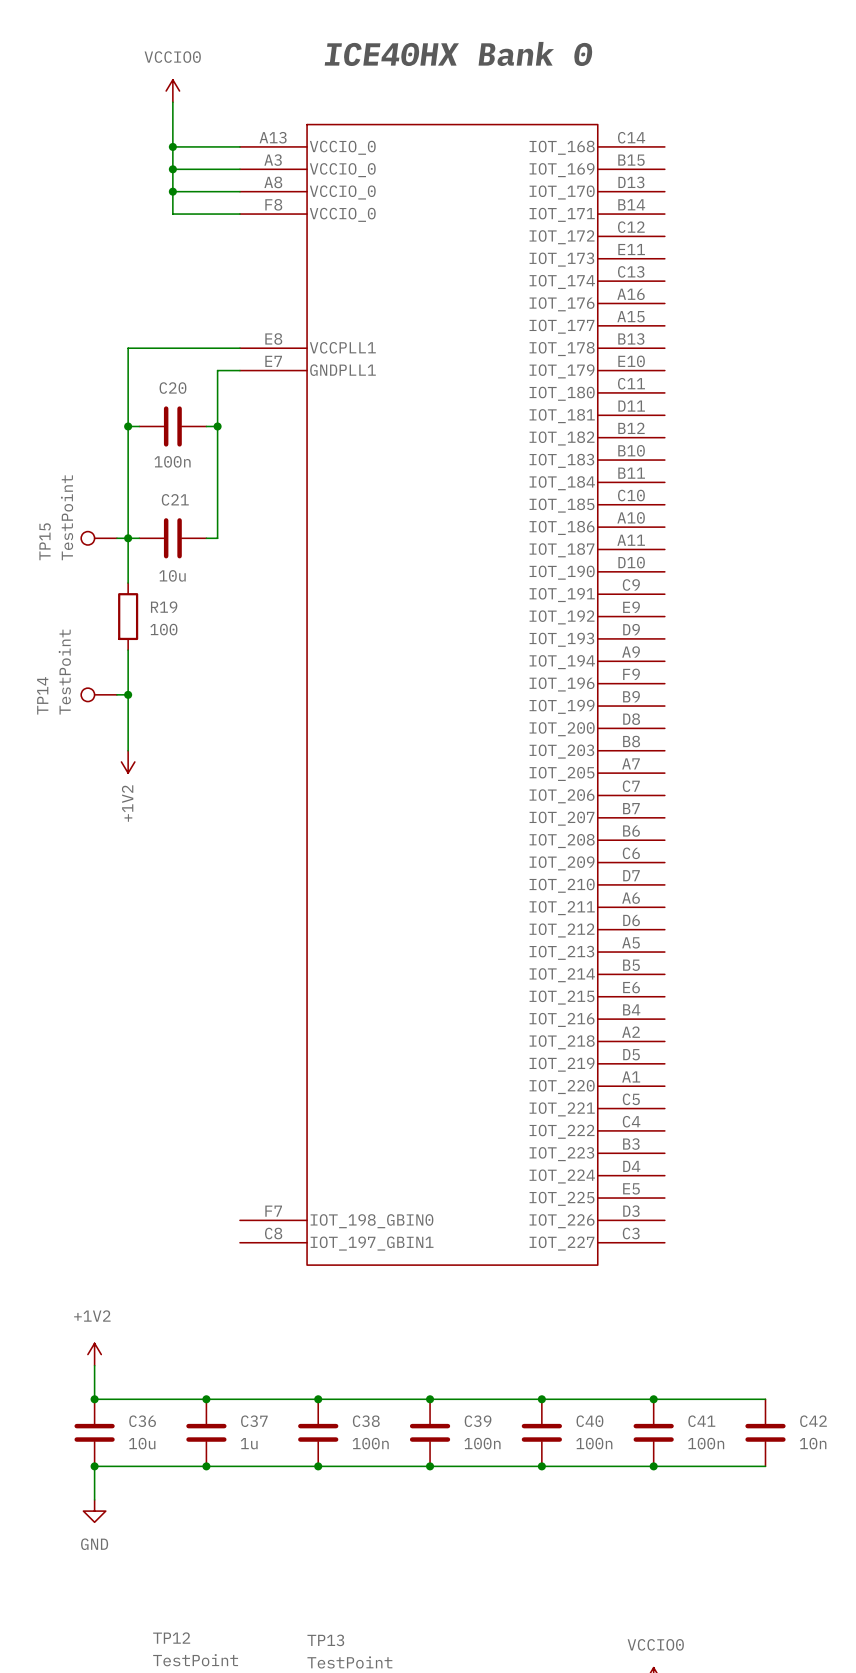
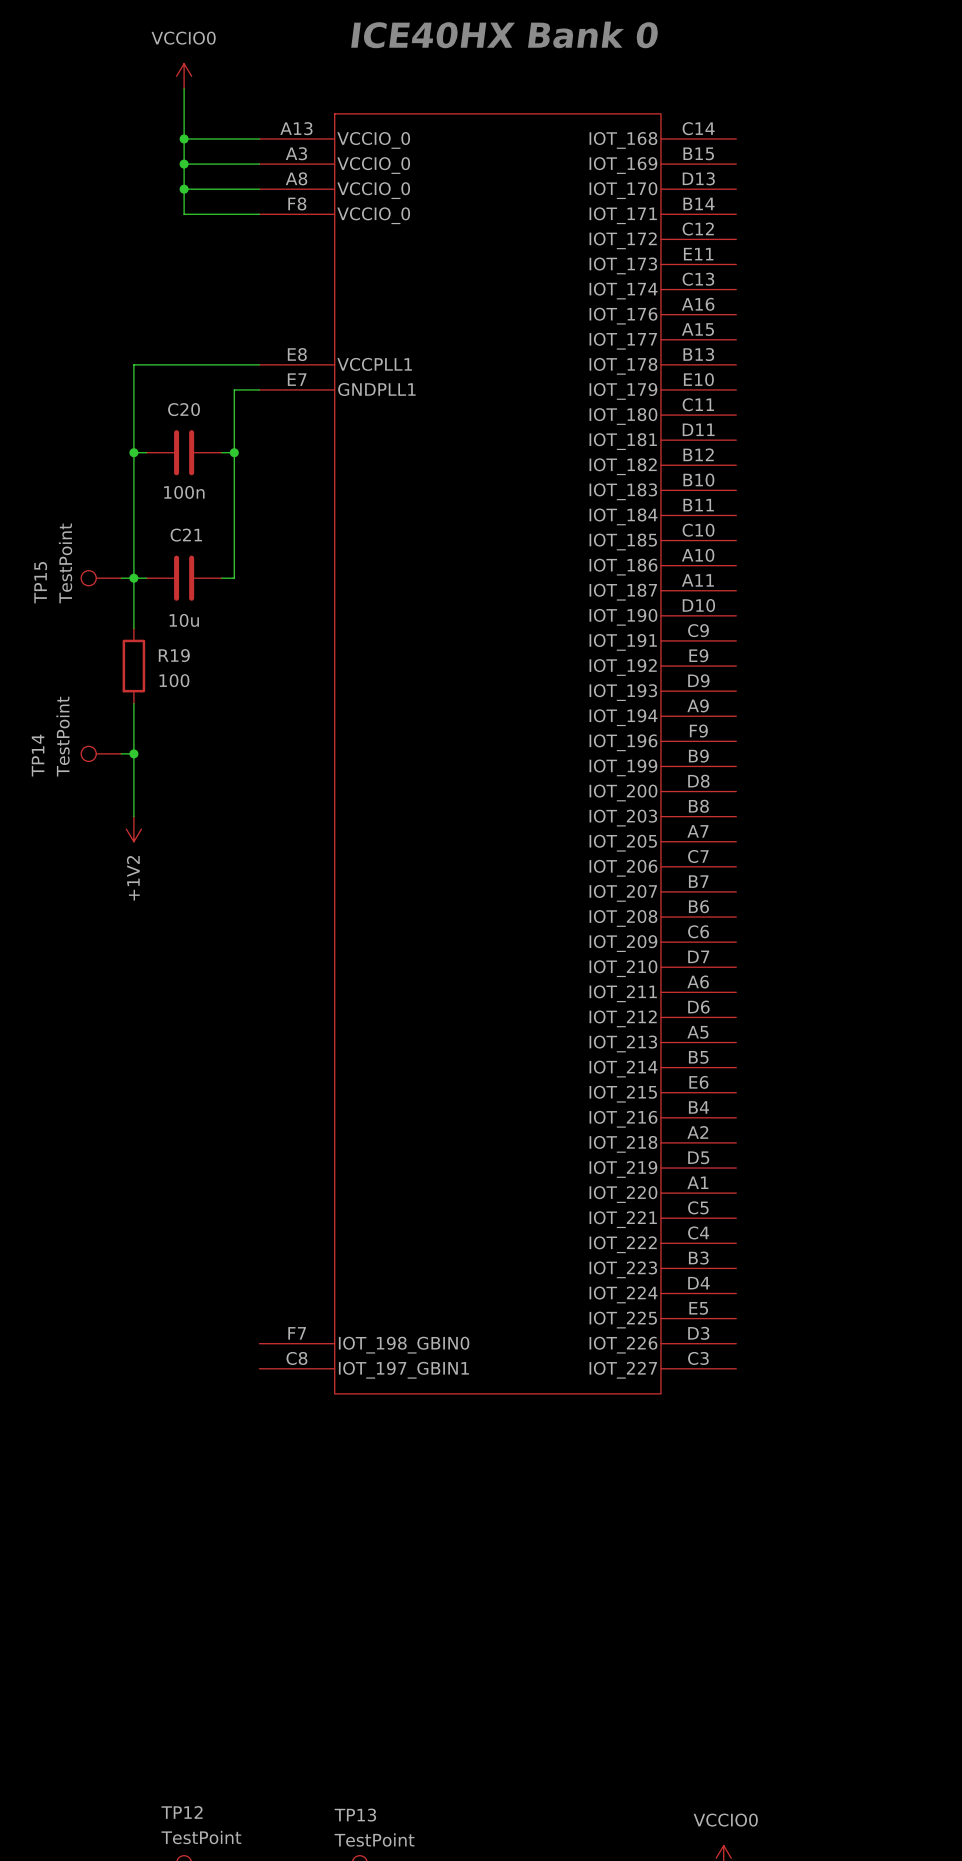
power symbol: +1V2 (94, 1354) -> none
wire: (94, 1365) (94, 1399) (765, 1399) -> none
junction: (94, 1399) -> none
junction: (206, 1399) -> none
junction: (318, 1399) -> none
junction: (430, 1399) -> none
junction: (541, 1399) -> none
junction: (653, 1399) -> none
C36: 10u (94, 1432) -> none
C37: 1u (206, 1432) -> none
C38: 100n (318, 1432) -> none
C39: 100n (430, 1432) -> none
C40: 100n (541, 1432) -> none
C41: 100n (653, 1432) -> none
C42: 10n (765, 1432) -> none
junction: (94, 1466) -> none
junction: (206, 1466) -> none
junction: (318, 1466) -> none
junction: (430, 1466) -> none
junction: (541, 1466) -> none
junction: (653, 1466) -> none
wire: (765, 1466) (94, 1466) (94, 1499) -> none
power symbol: GND (94, 1511) -> none

